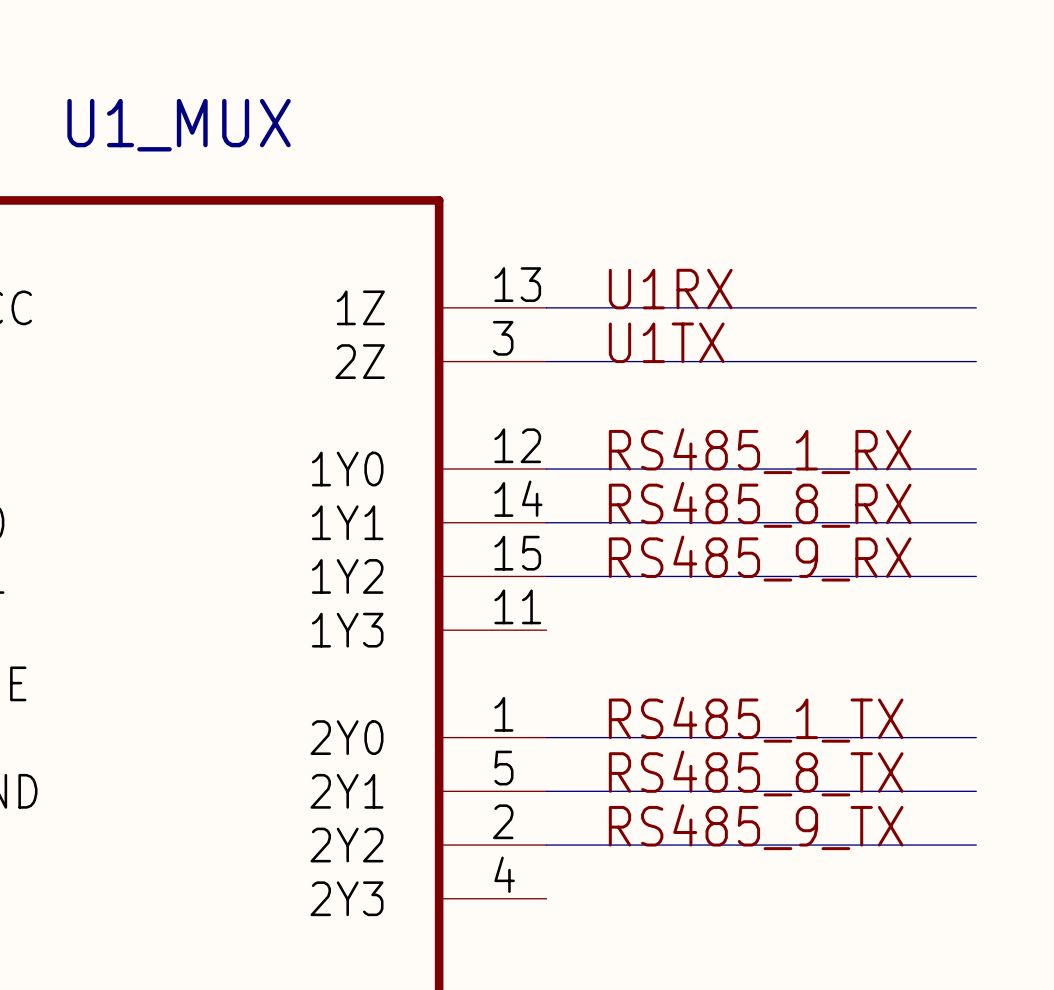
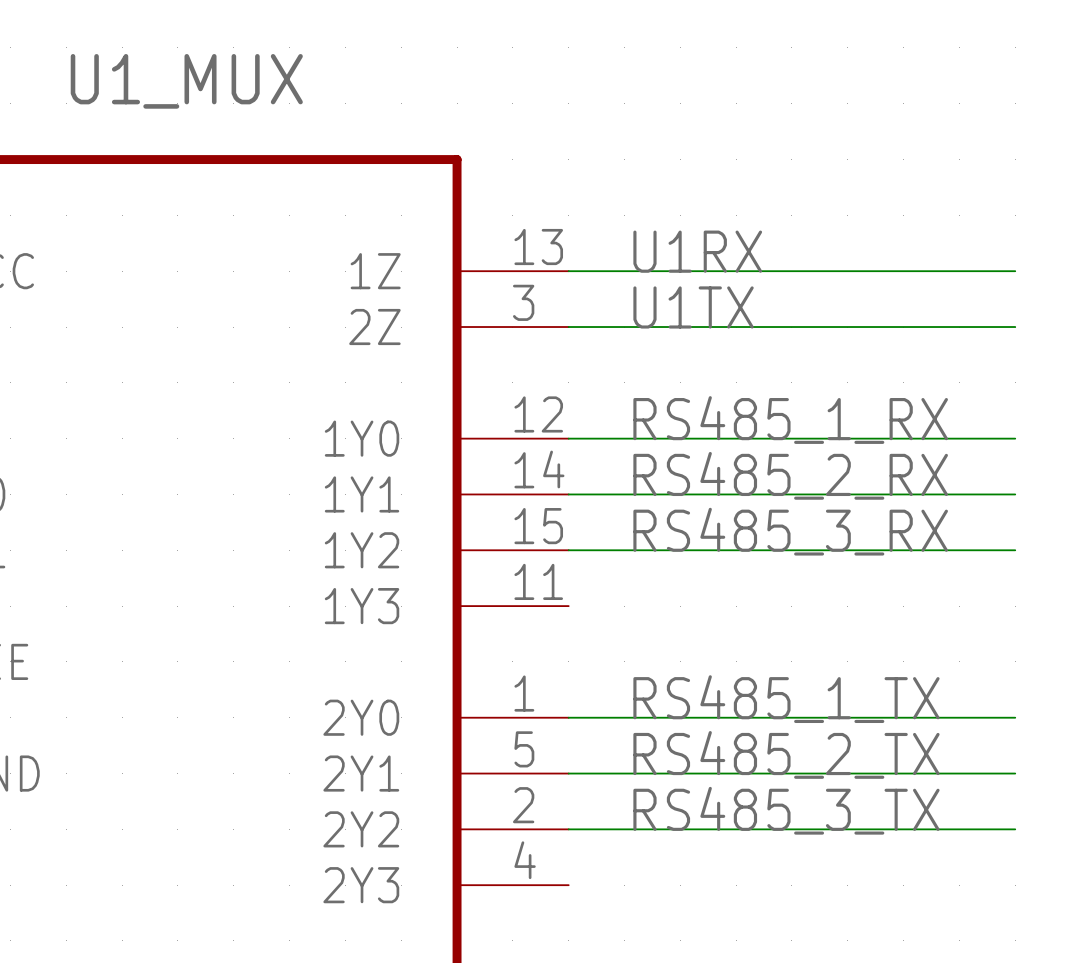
label: RS485_8_RX (760, 504) -> RS485_2_RX (790, 475)
label: RS485_9_RX (760, 558) -> RS485_3_RX (790, 531)
label: RS485_8_TX (756, 773) -> RS485_2_TX (786, 754)
label: RS485_9_TX (756, 827) -> RS485_3_TX (786, 810)

